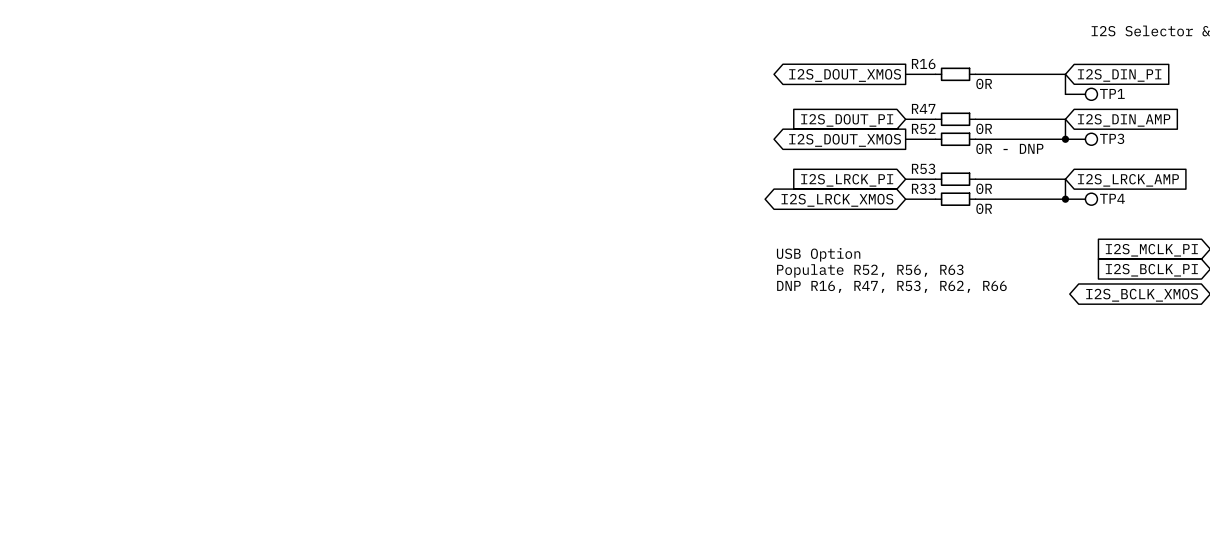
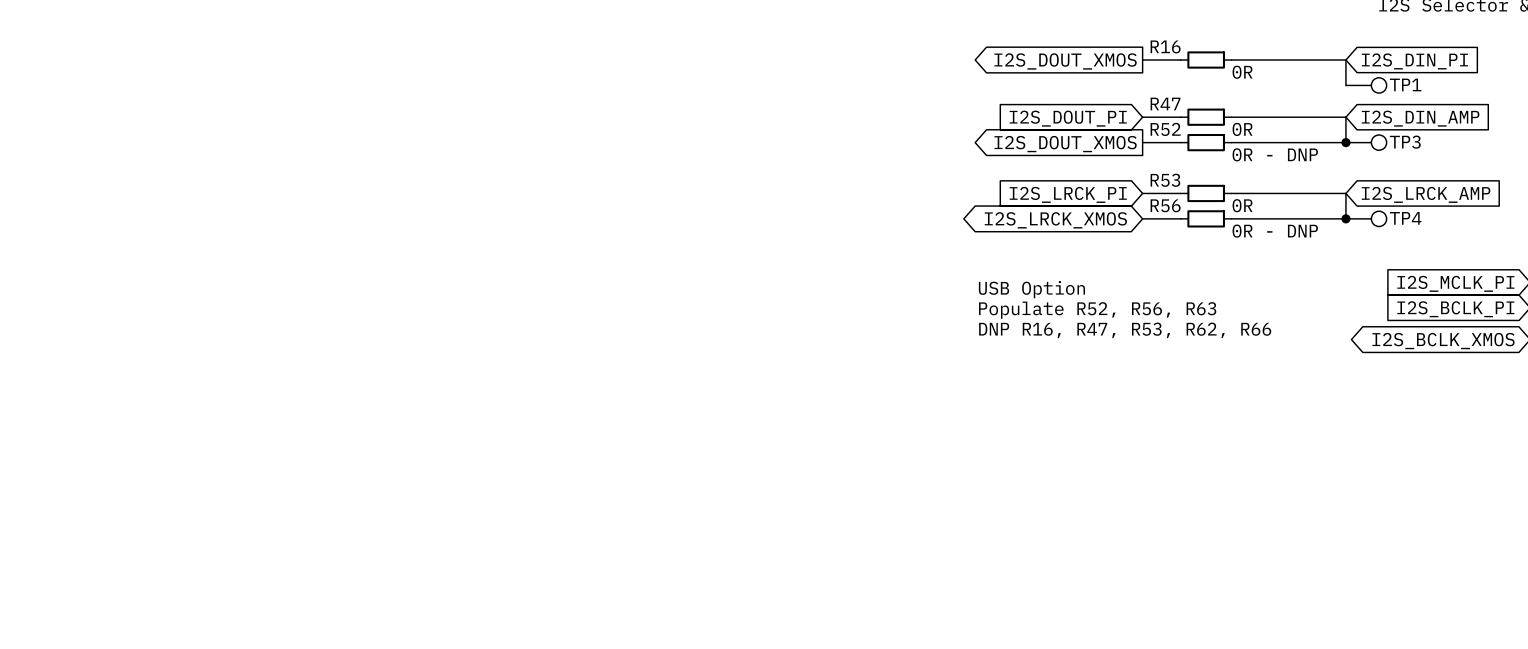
R33 name: R33 (923, 188) -> R56 (1165, 205)
R33 value: 0R (984, 208) -> 0R - DNP (1275, 231)

